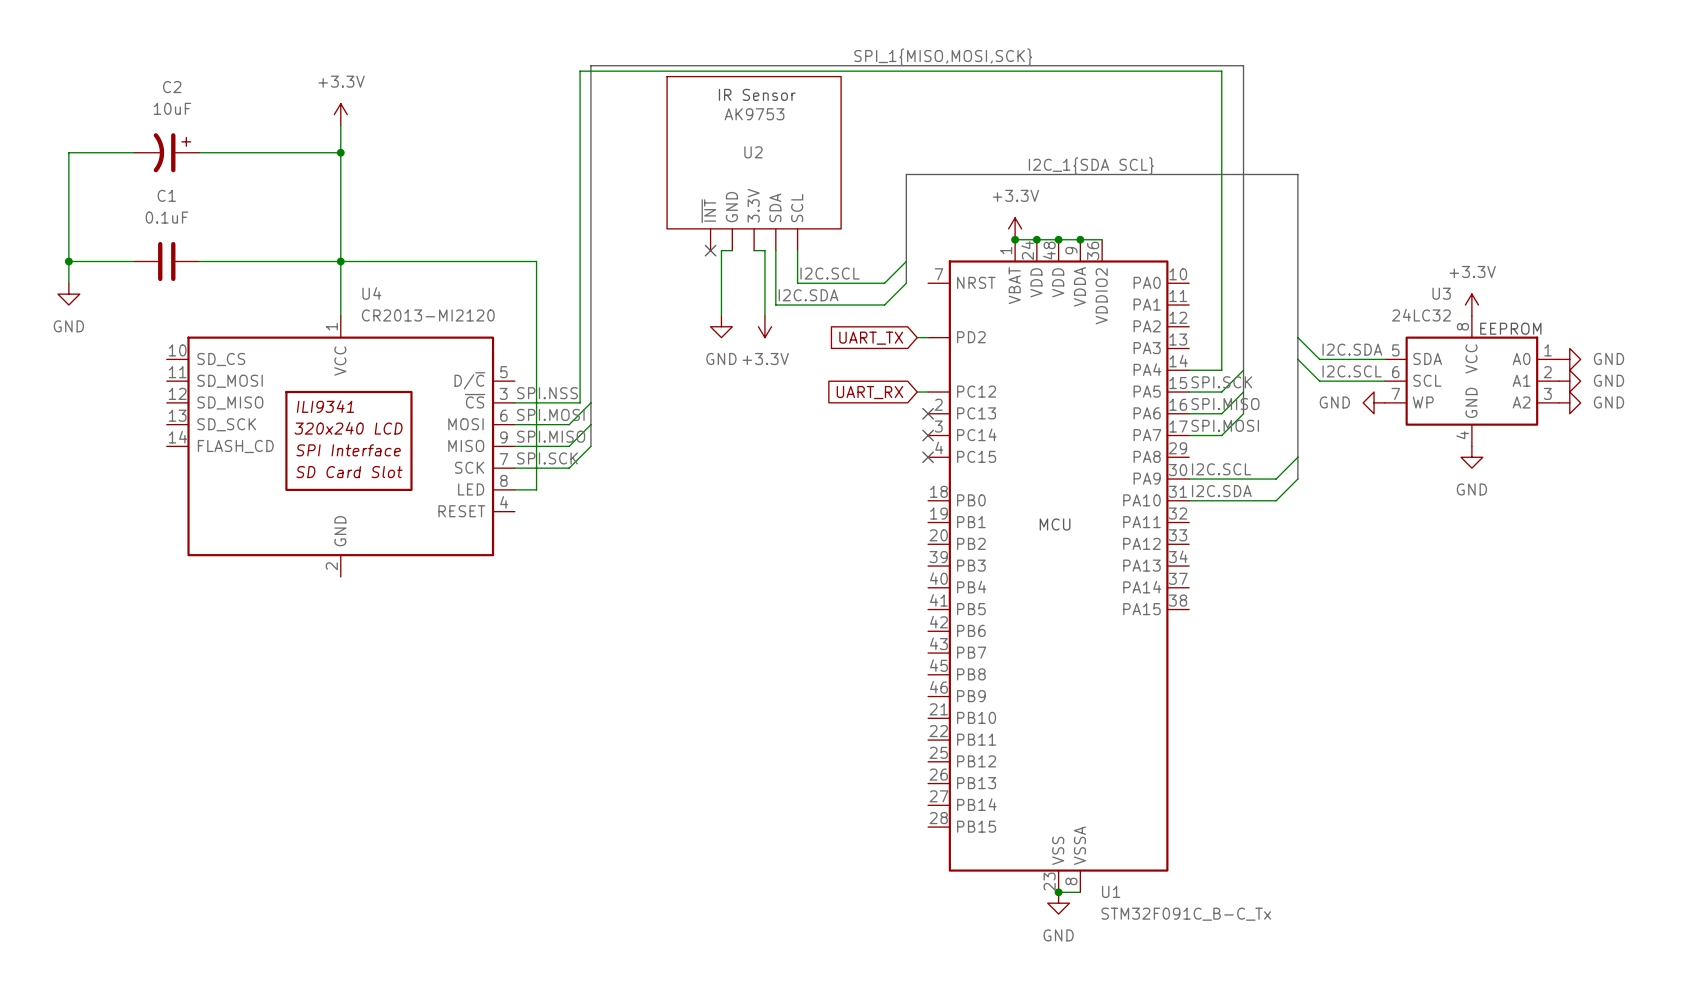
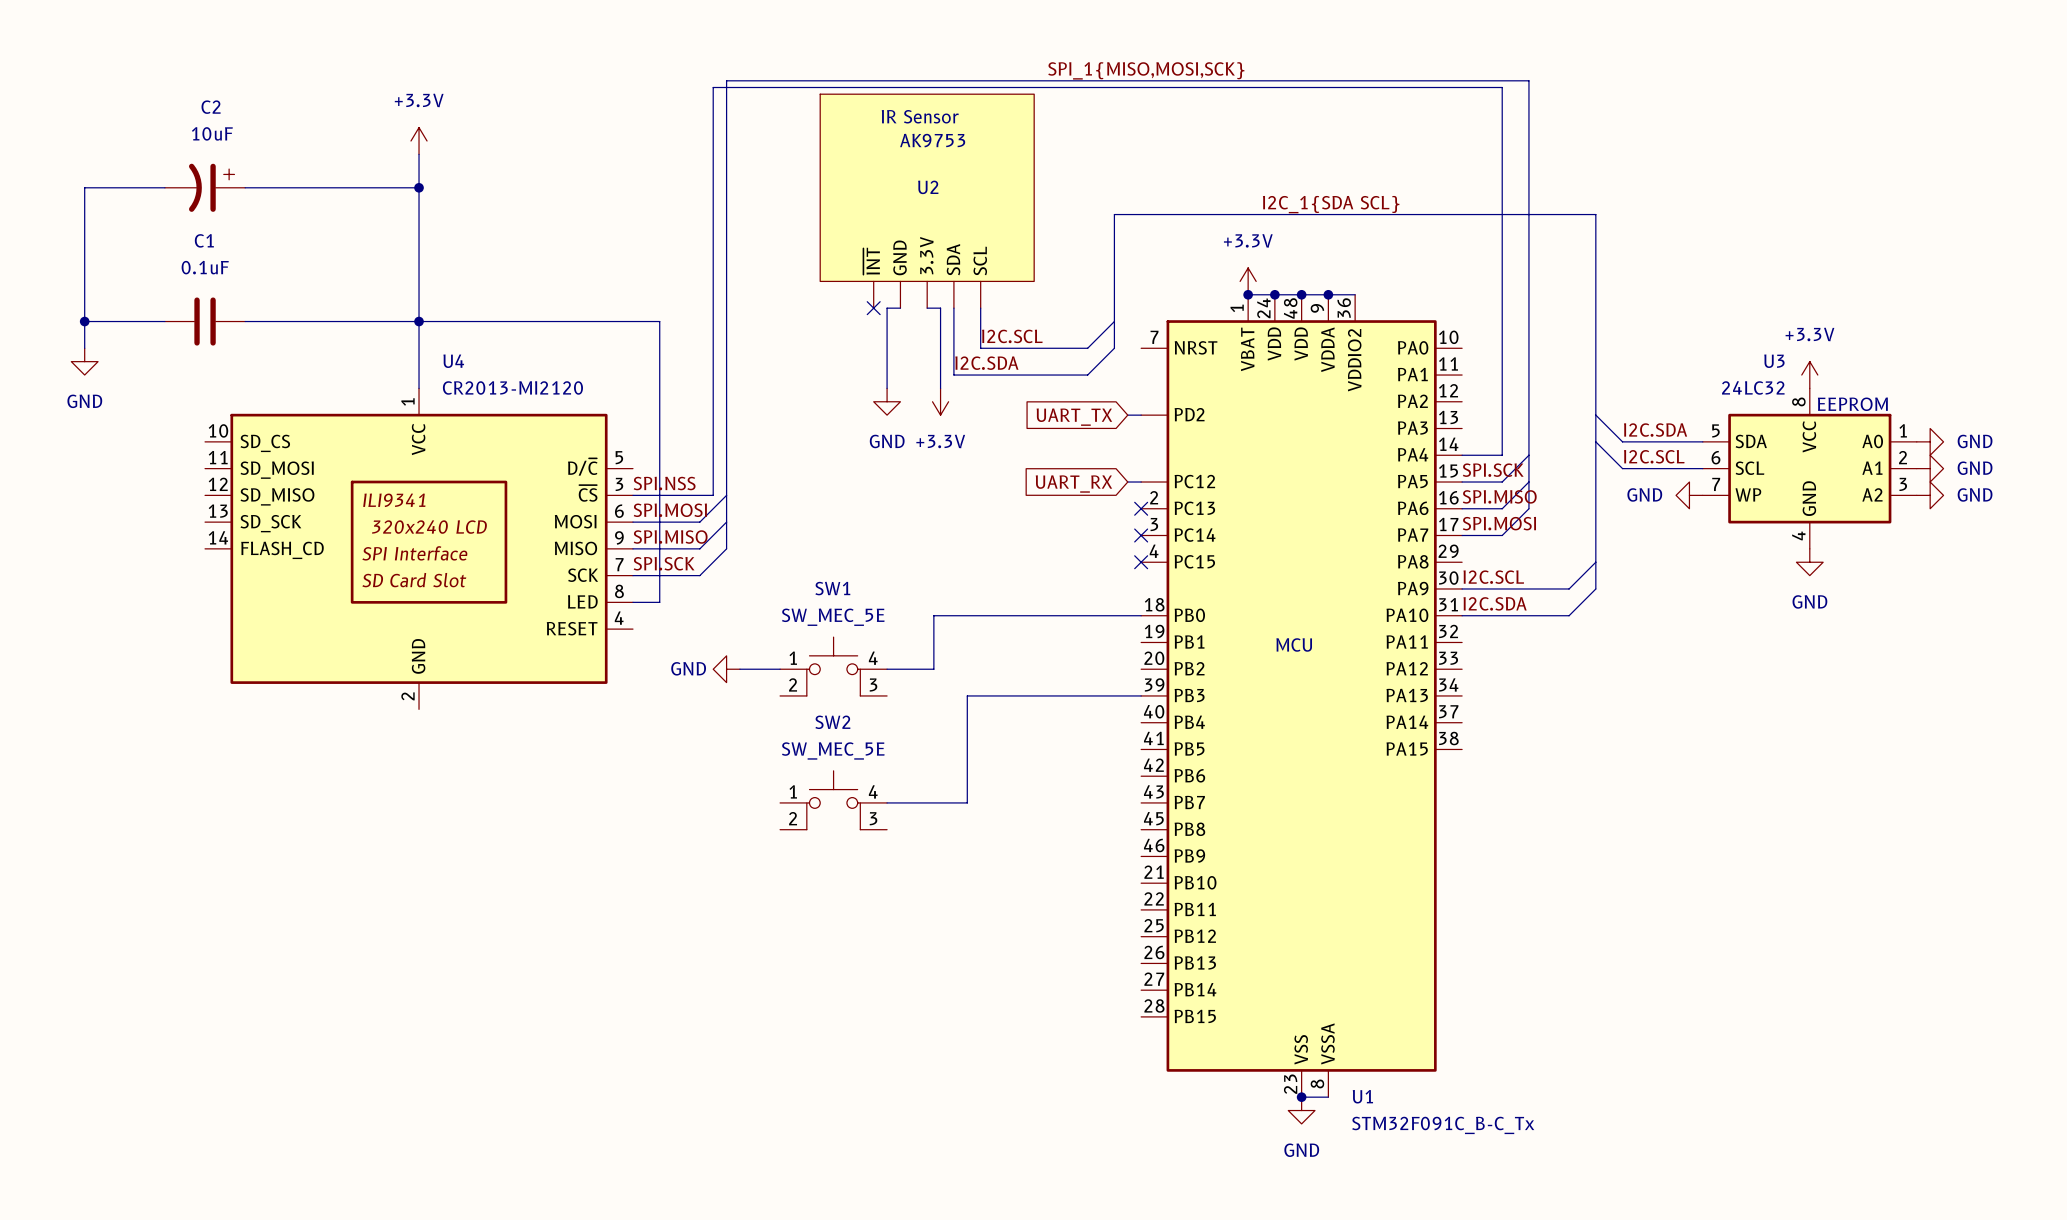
wire: none -> (1141, 615) (933, 615) (933, 669) (887, 669)
SW1: none -> SW_MEC_5E (833, 666)
power symbol: none -> GND (726, 669)
wire: none -> (739, 669) (780, 669)
wire: none -> (1141, 695) (967, 695) (967, 802) (887, 802)
SW2: none -> SW_MEC_5E (833, 800)

